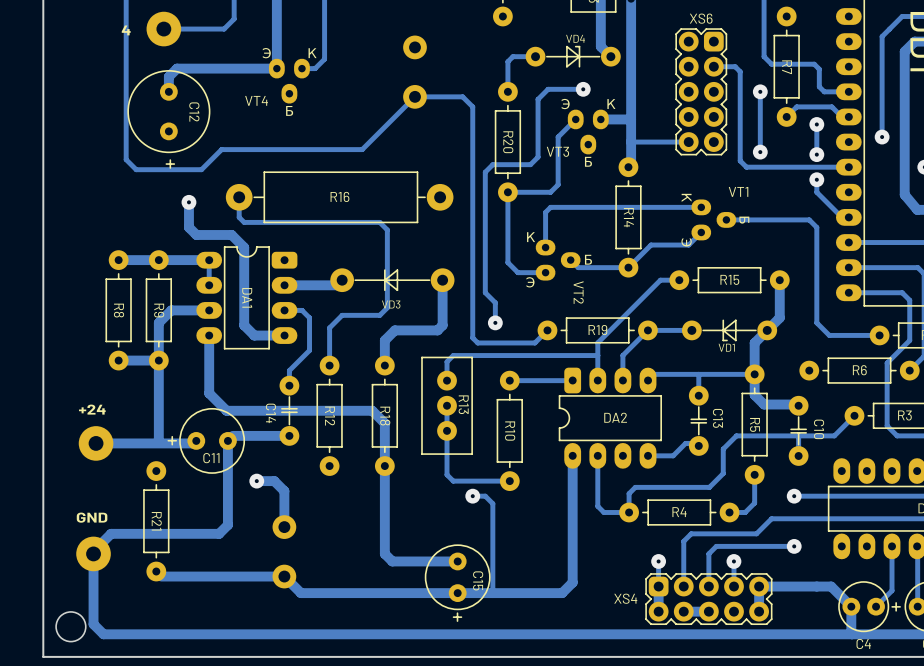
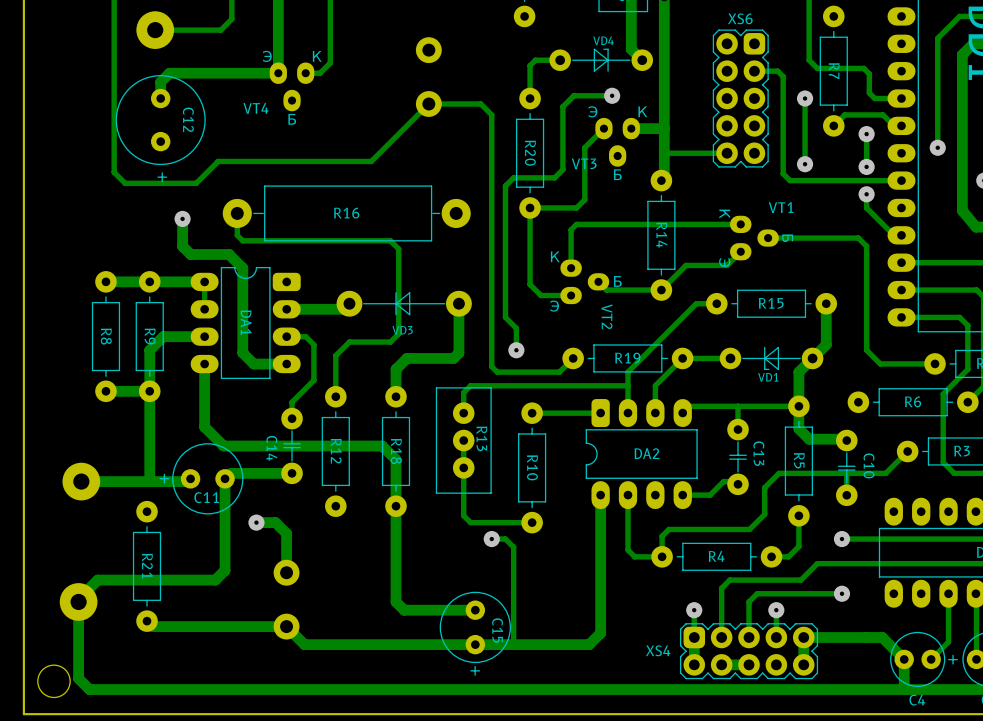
text: 4 (126, 30) -> none
text: +24 (92, 409) -> none
text: GND (92, 517) -> none

